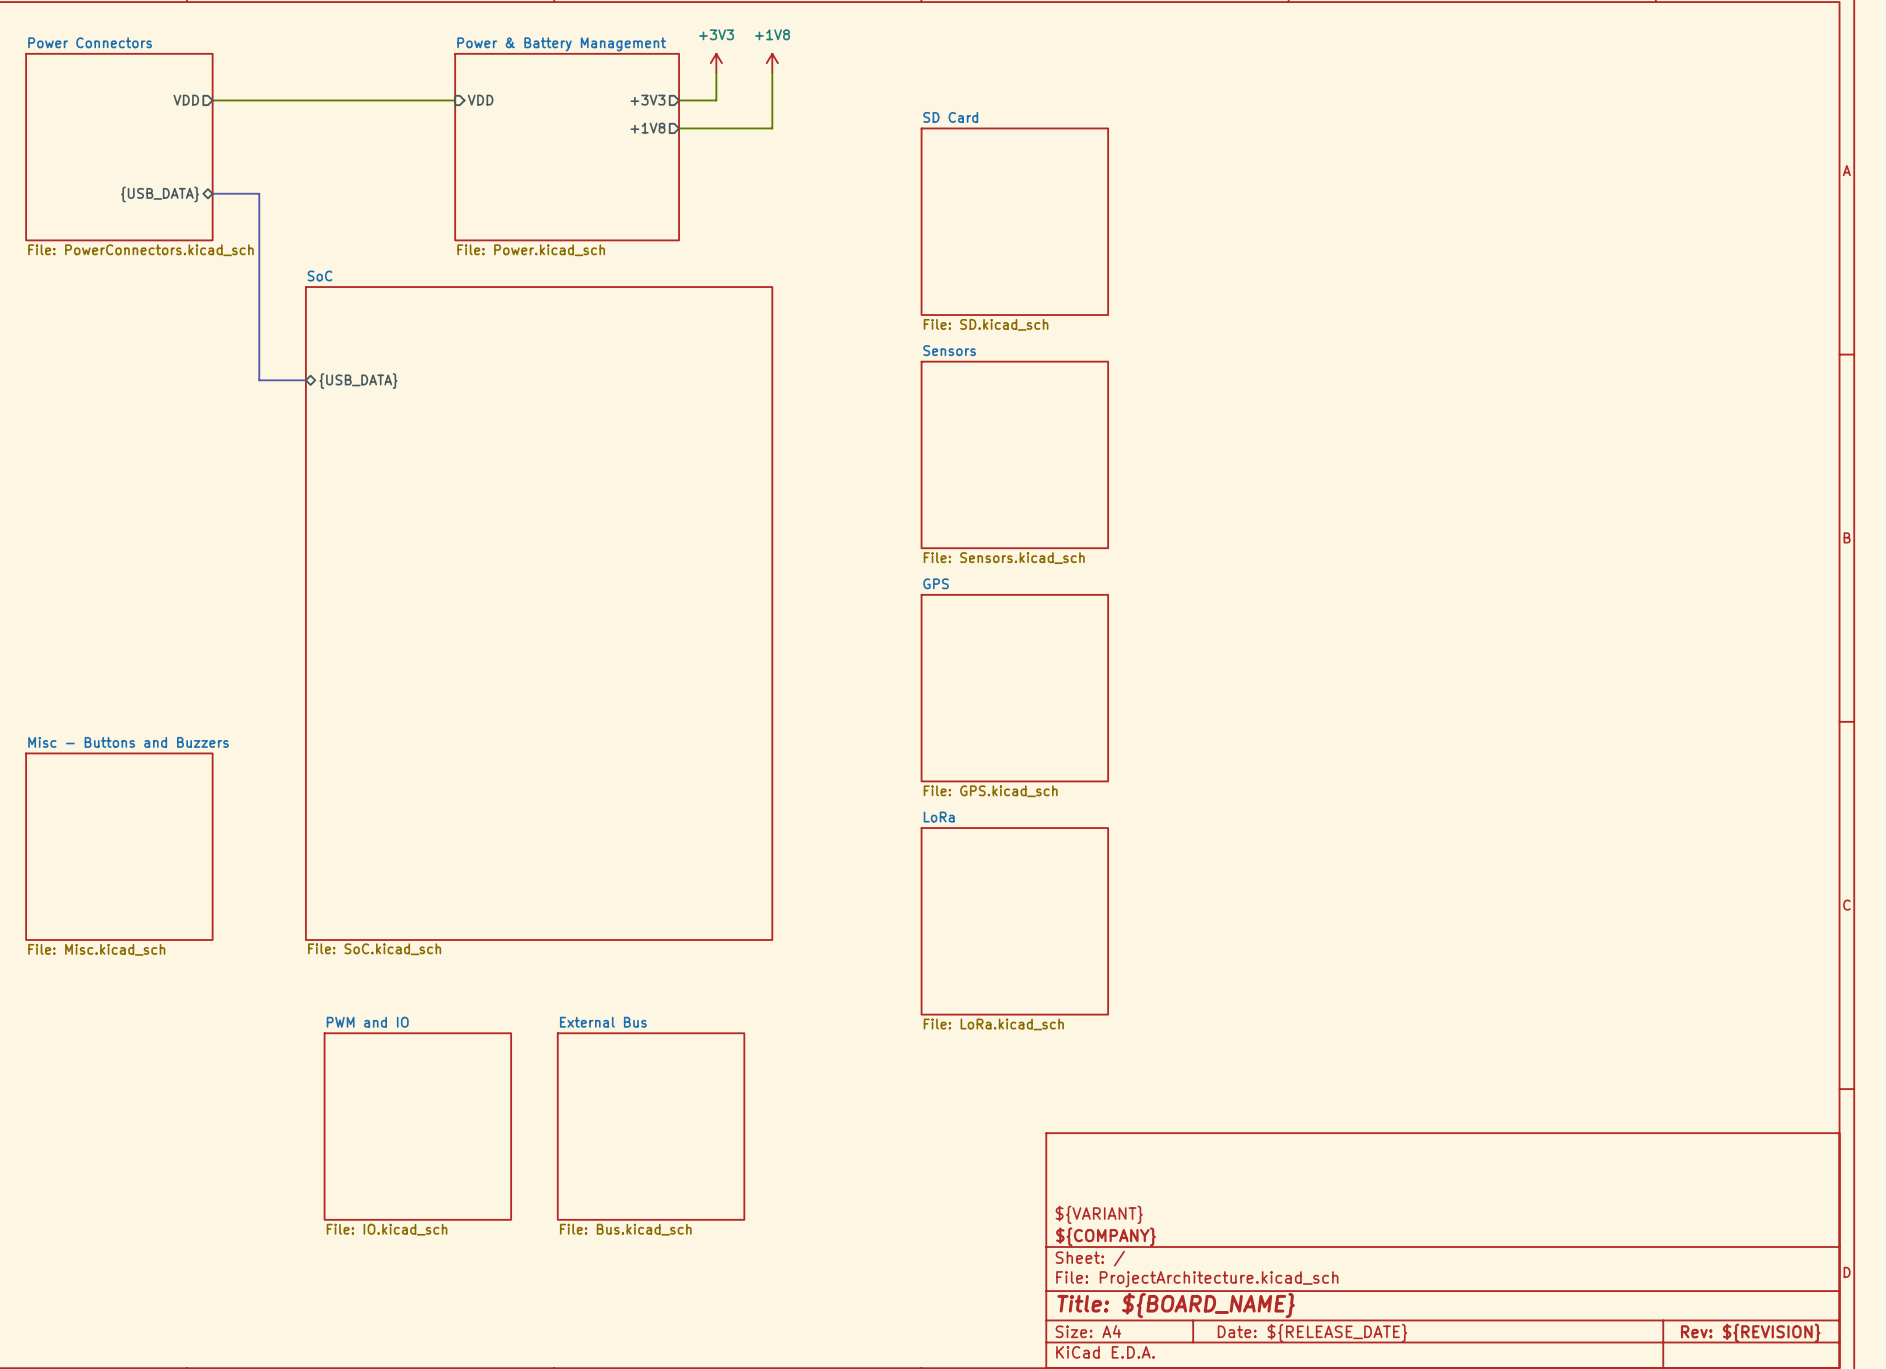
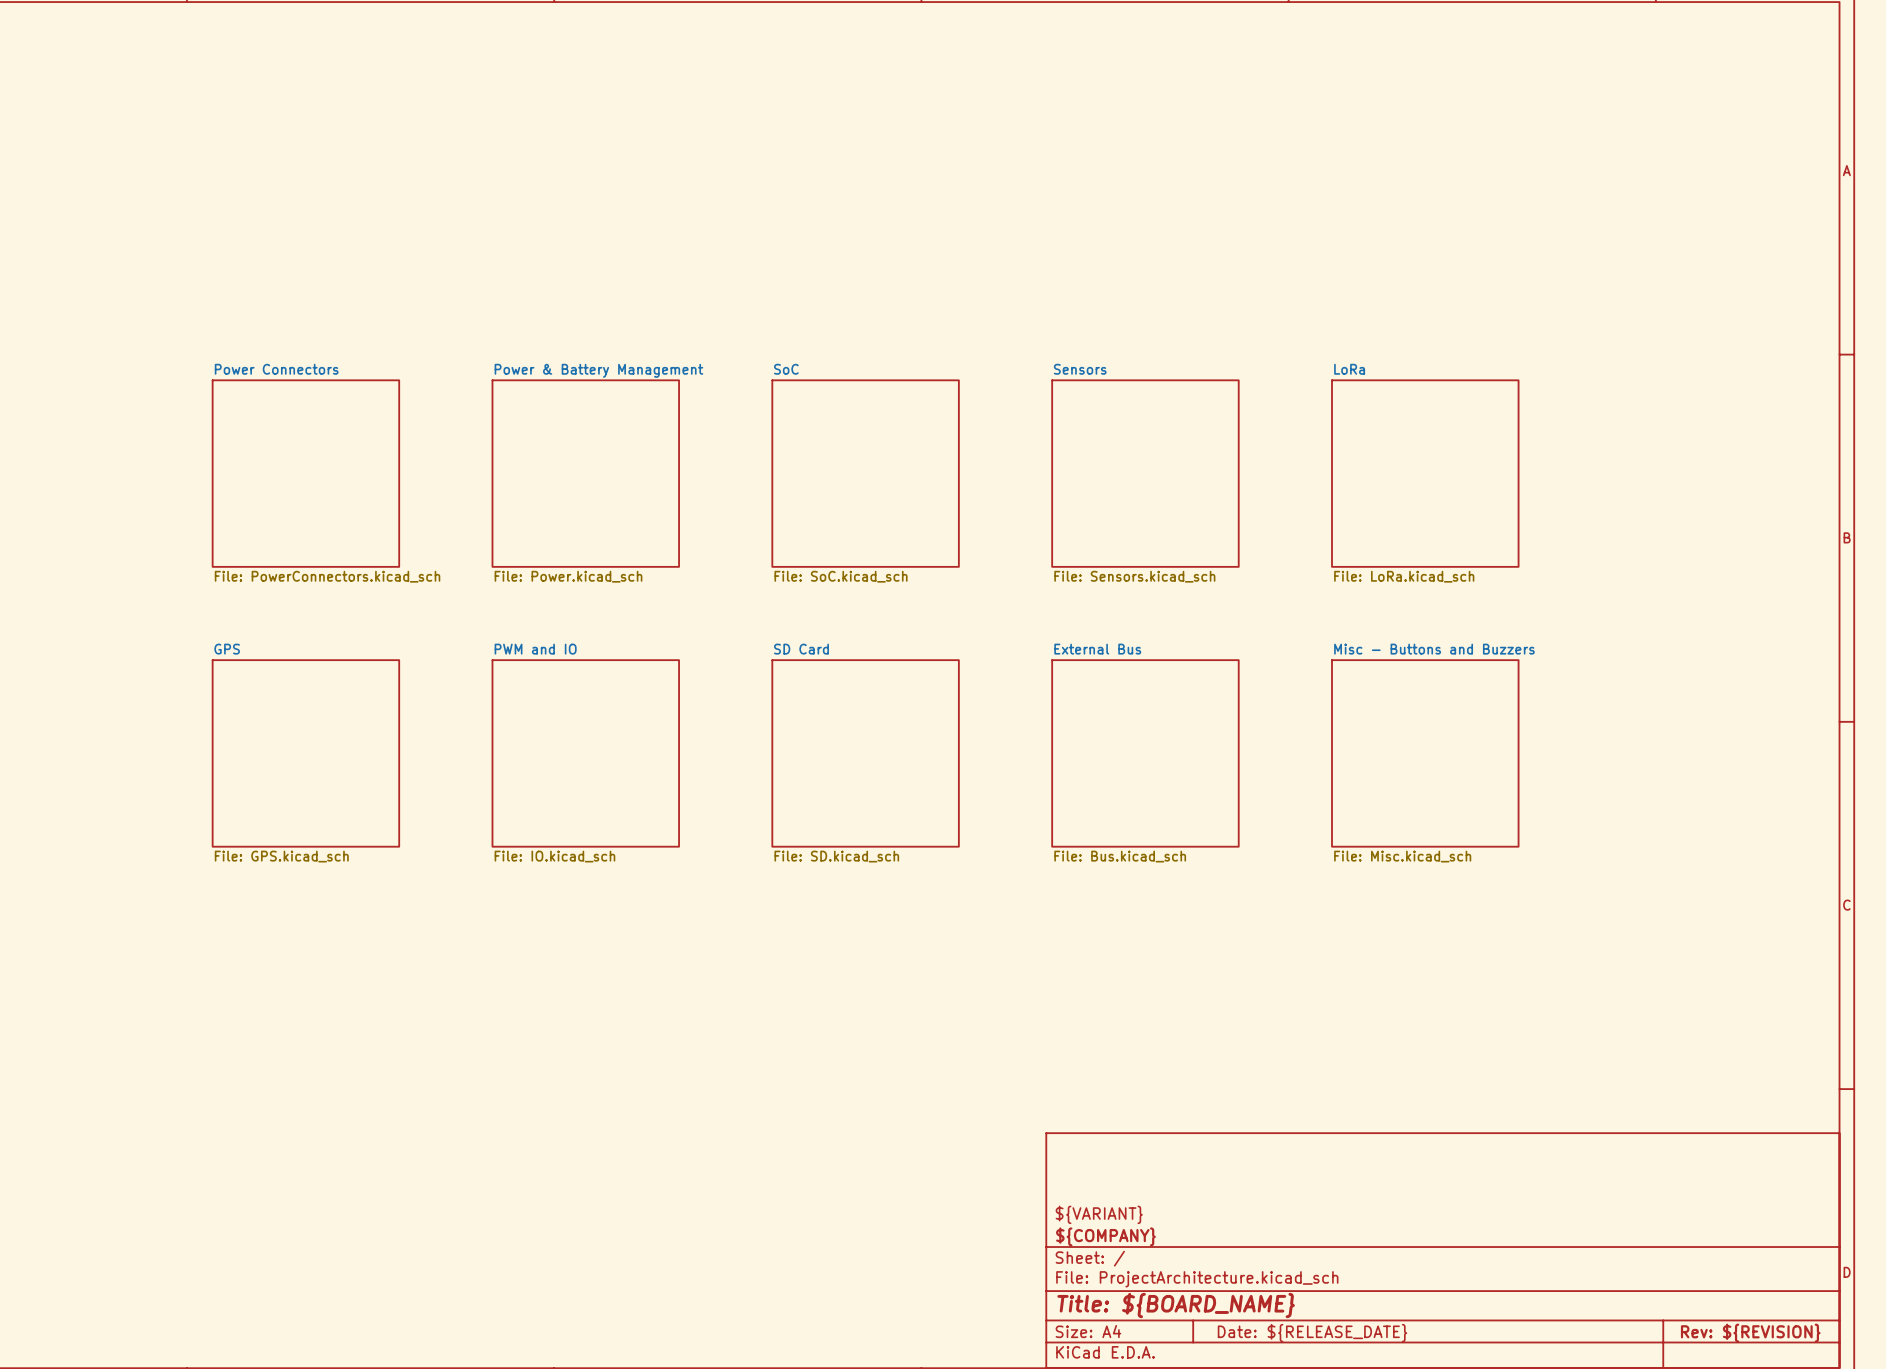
power symbol: +3V3 (716, 63) -> none
power symbol: +1V8 (772, 63) -> none
wire: (716, 72) (716, 100) (679, 100) -> none
wire: (772, 72) (772, 128) (679, 128) -> none
sheet pin: VDD (186, 100) -> none
wire: (212, 100) (455, 100) -> none
sheet pin: VDD (480, 100) -> none
sheet pin: +3V3 (648, 100) -> none
sheet pin: +1V8 (648, 128) -> none
sheet Power Connectors: File: PowerConnectors.kicad_sch (119, 147) -> none
sheet Power & Battery Management: File: Power.kicad_sch (567, 147) -> none
bus: (212, 193) (259, 193) (259, 380) (305, 380) -> none
sheet pin: {USB_DATA} (160, 194) -> none
sheet SD Card: File: SD.kicad_sch (1014, 221) -> none
sheet pin: {USB_DATA} (358, 381) -> none
sheet Sensors position: (1014, 454) -> (1145, 473)
sheet Power Connectors: none -> File: PowerConnectors.kicad_sch (305, 473)
sheet Power & Battery Management: none -> File: Power.kicad_sch (585, 473)
sheet SoC: none -> File: SoC.kicad_sch (865, 473)
sheet LoRa: none -> File: LoRa.kicad_sch (1425, 473)
sheet SoC: File: SoC.kicad_sch (539, 613) -> none
sheet GPS: File: GPS.kicad_sch (1014, 688) -> none
sheet GPS: none -> File: GPS.kicad_sch (305, 753)
sheet PWM and IO: none -> File: IO.kicad_sch (585, 753)
sheet SD Card: none -> File: SD.kicad_sch (865, 753)
sheet External Bus: none -> File: Bus.kicad_sch (1145, 753)
sheet Misc - Buttons and Buzzers: none -> File: Misc.kicad_sch (1425, 753)
sheet Misc - Buttons and Buzzers: File: Misc.kicad_sch (119, 846) -> none
sheet LoRa: File: LoRa.kicad_sch (1014, 921) -> none
sheet PWM and IO: File: IO.kicad_sch (417, 1126) -> none
sheet External Bus: File: Bus.kicad_sch (651, 1126) -> none

